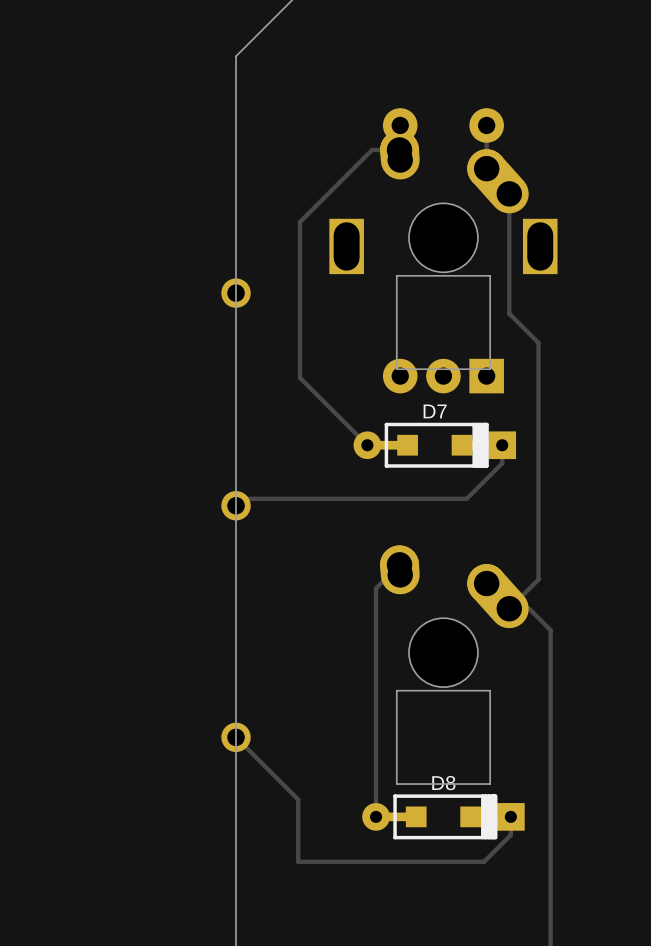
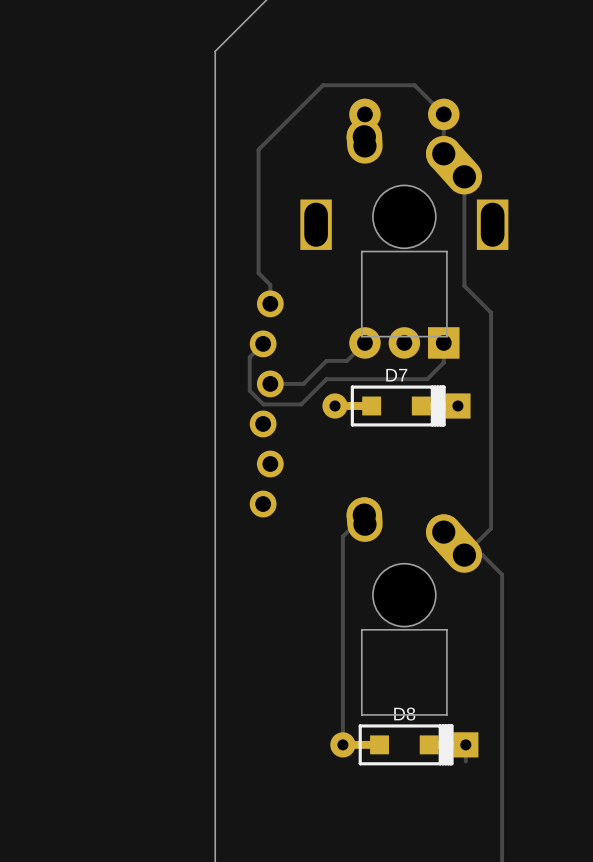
track: none -> (443, 114) (414, 85) (323, 85) (258, 149) (258, 273) (270, 284) (270, 303)
track: (399, 150) (372, 150) (299, 222) (299, 377) (367, 445) -> none
part: (236, 293) -> none
track: none -> (364, 342) (346, 360) (326, 360) (303, 383) (270, 383)
track: none -> (443, 342) (443, 362) (427, 379) (326, 379) (301, 404) (263, 404) (249, 390) (249, 357) (263, 343)
part: none -> (266, 403)
track: (502, 445) (502, 463) (466, 498) (244, 498) (242, 501) (242, 505) -> none
part: (236, 505) -> none
part: (236, 737) -> none
track: (242, 743) (298, 799) (298, 861) (484, 861) (510, 835) -> none

